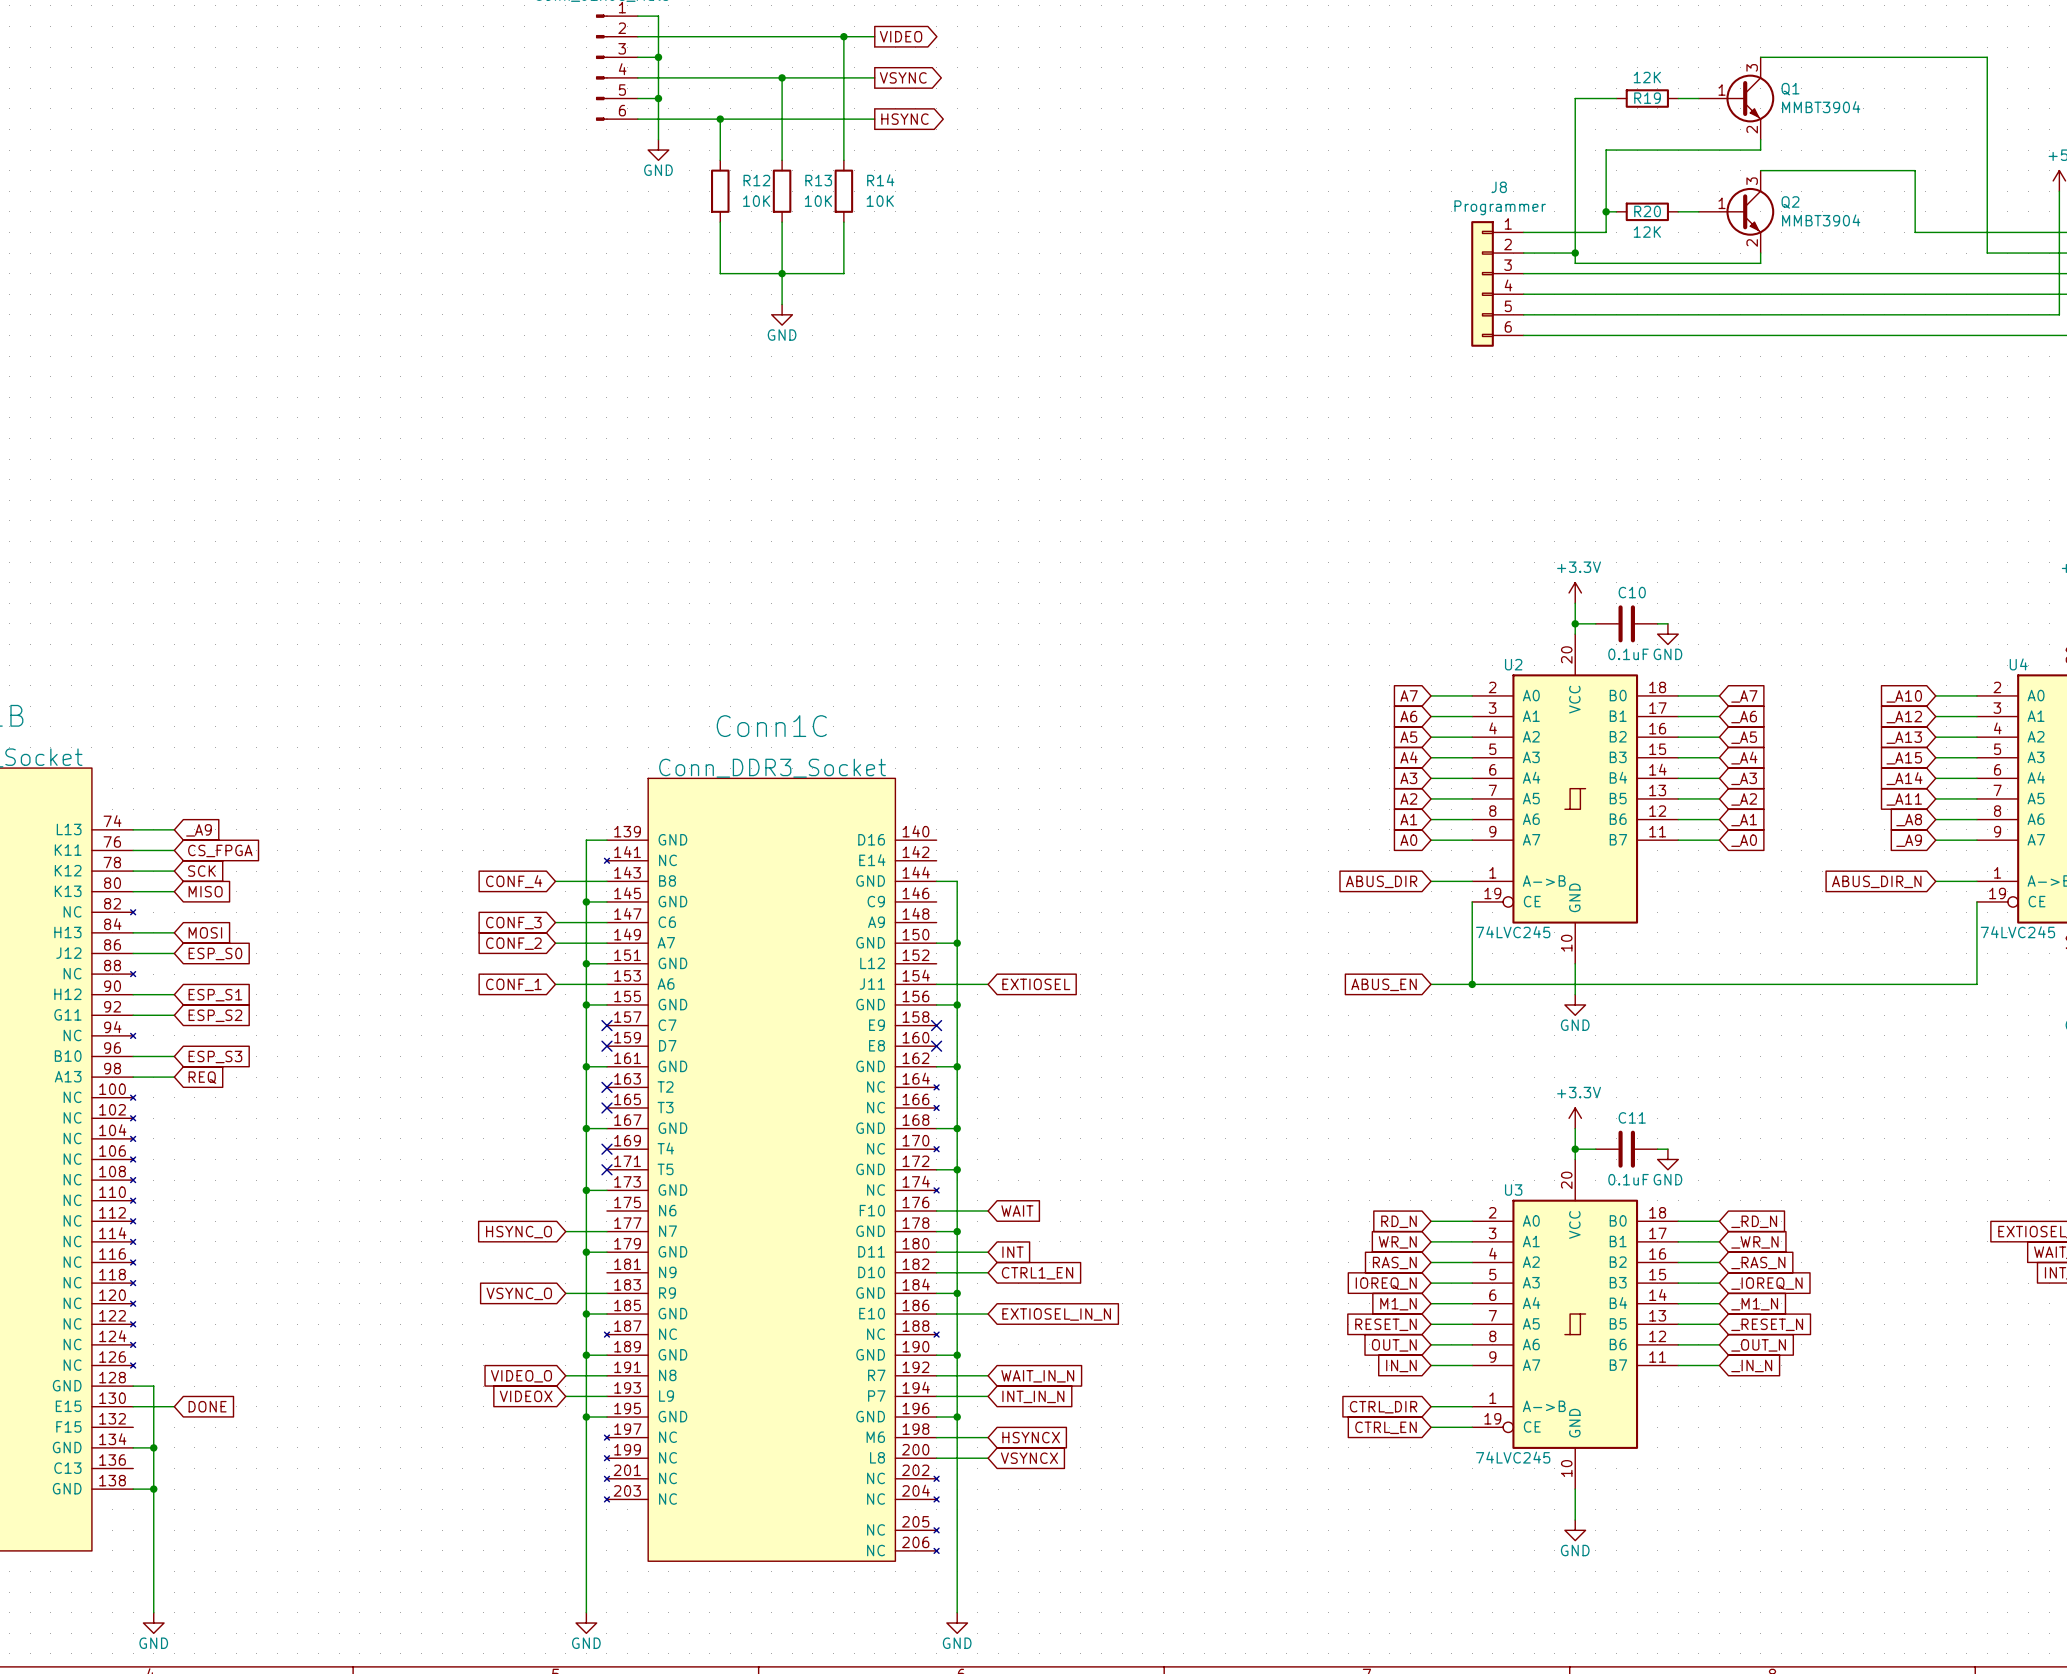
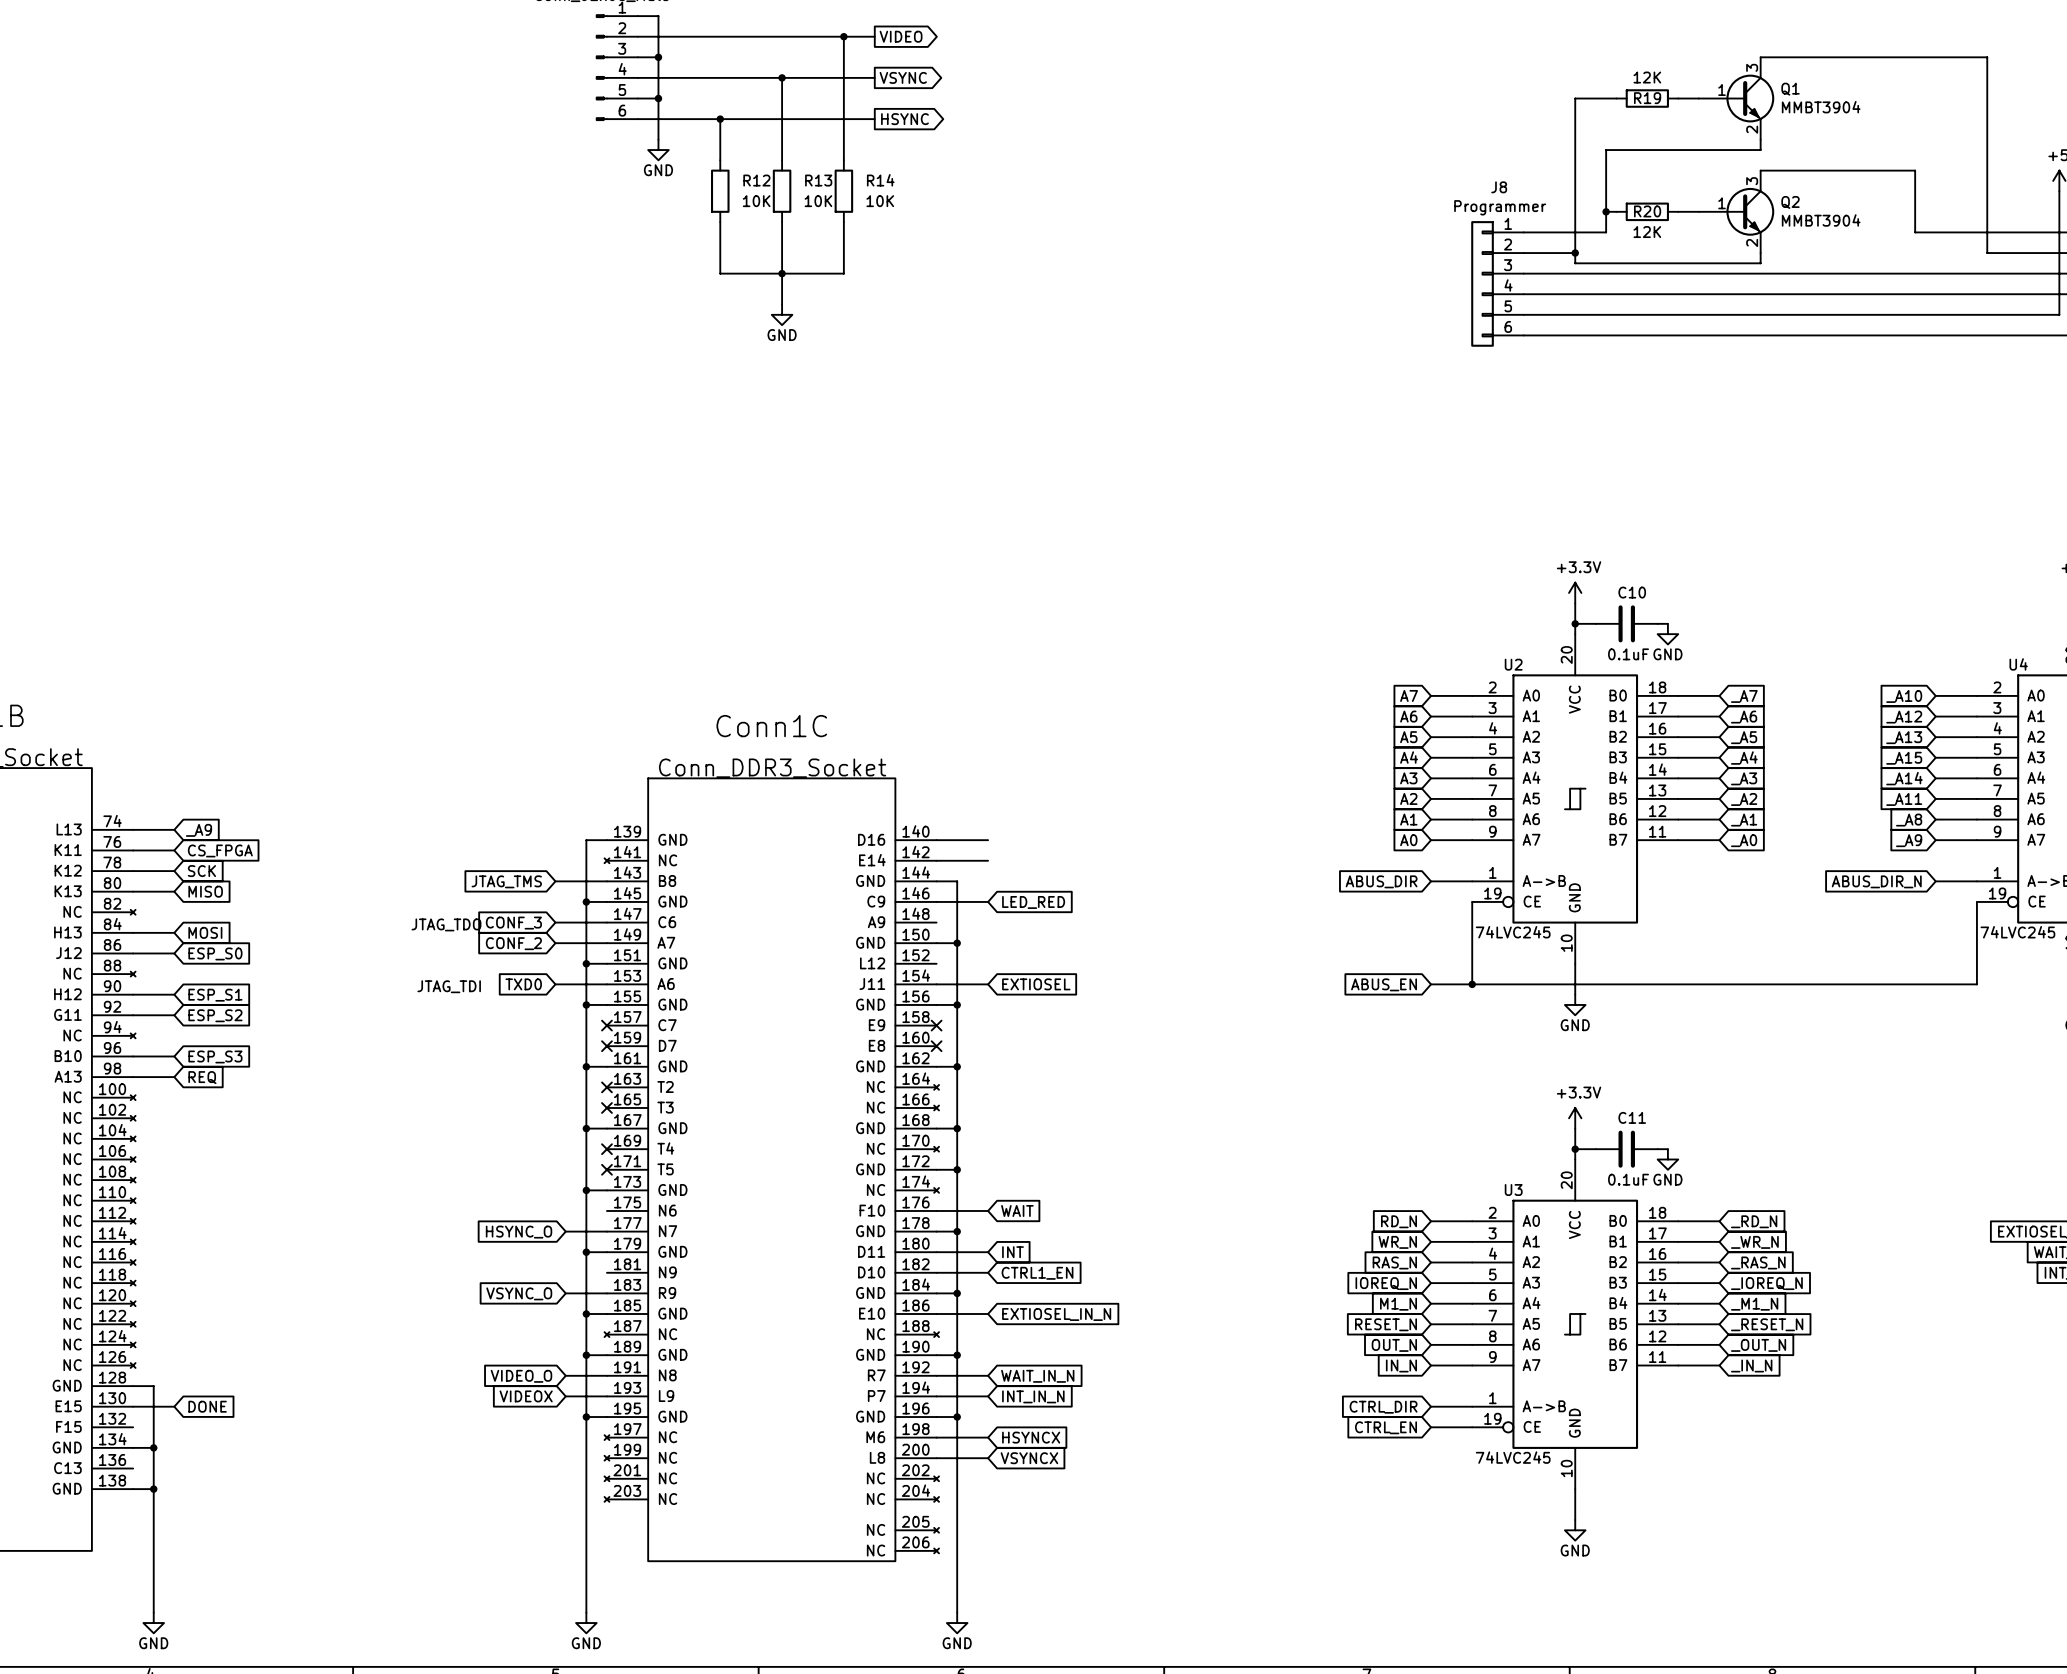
wire: none -> (936, 840) (988, 840)
wire: none -> (936, 860) (988, 860)
global label: CONF_4 (514, 881) -> JTAG_TMS (506, 881)
wire: none -> (936, 901) (988, 901)
global label: none -> LED_RED (1033, 902)
text: none -> JTAG_TDO (446, 924)
global label: CONF_1 (513, 984) -> TXD0 (523, 984)
text: none -> JTAG_TDI (449, 986)

